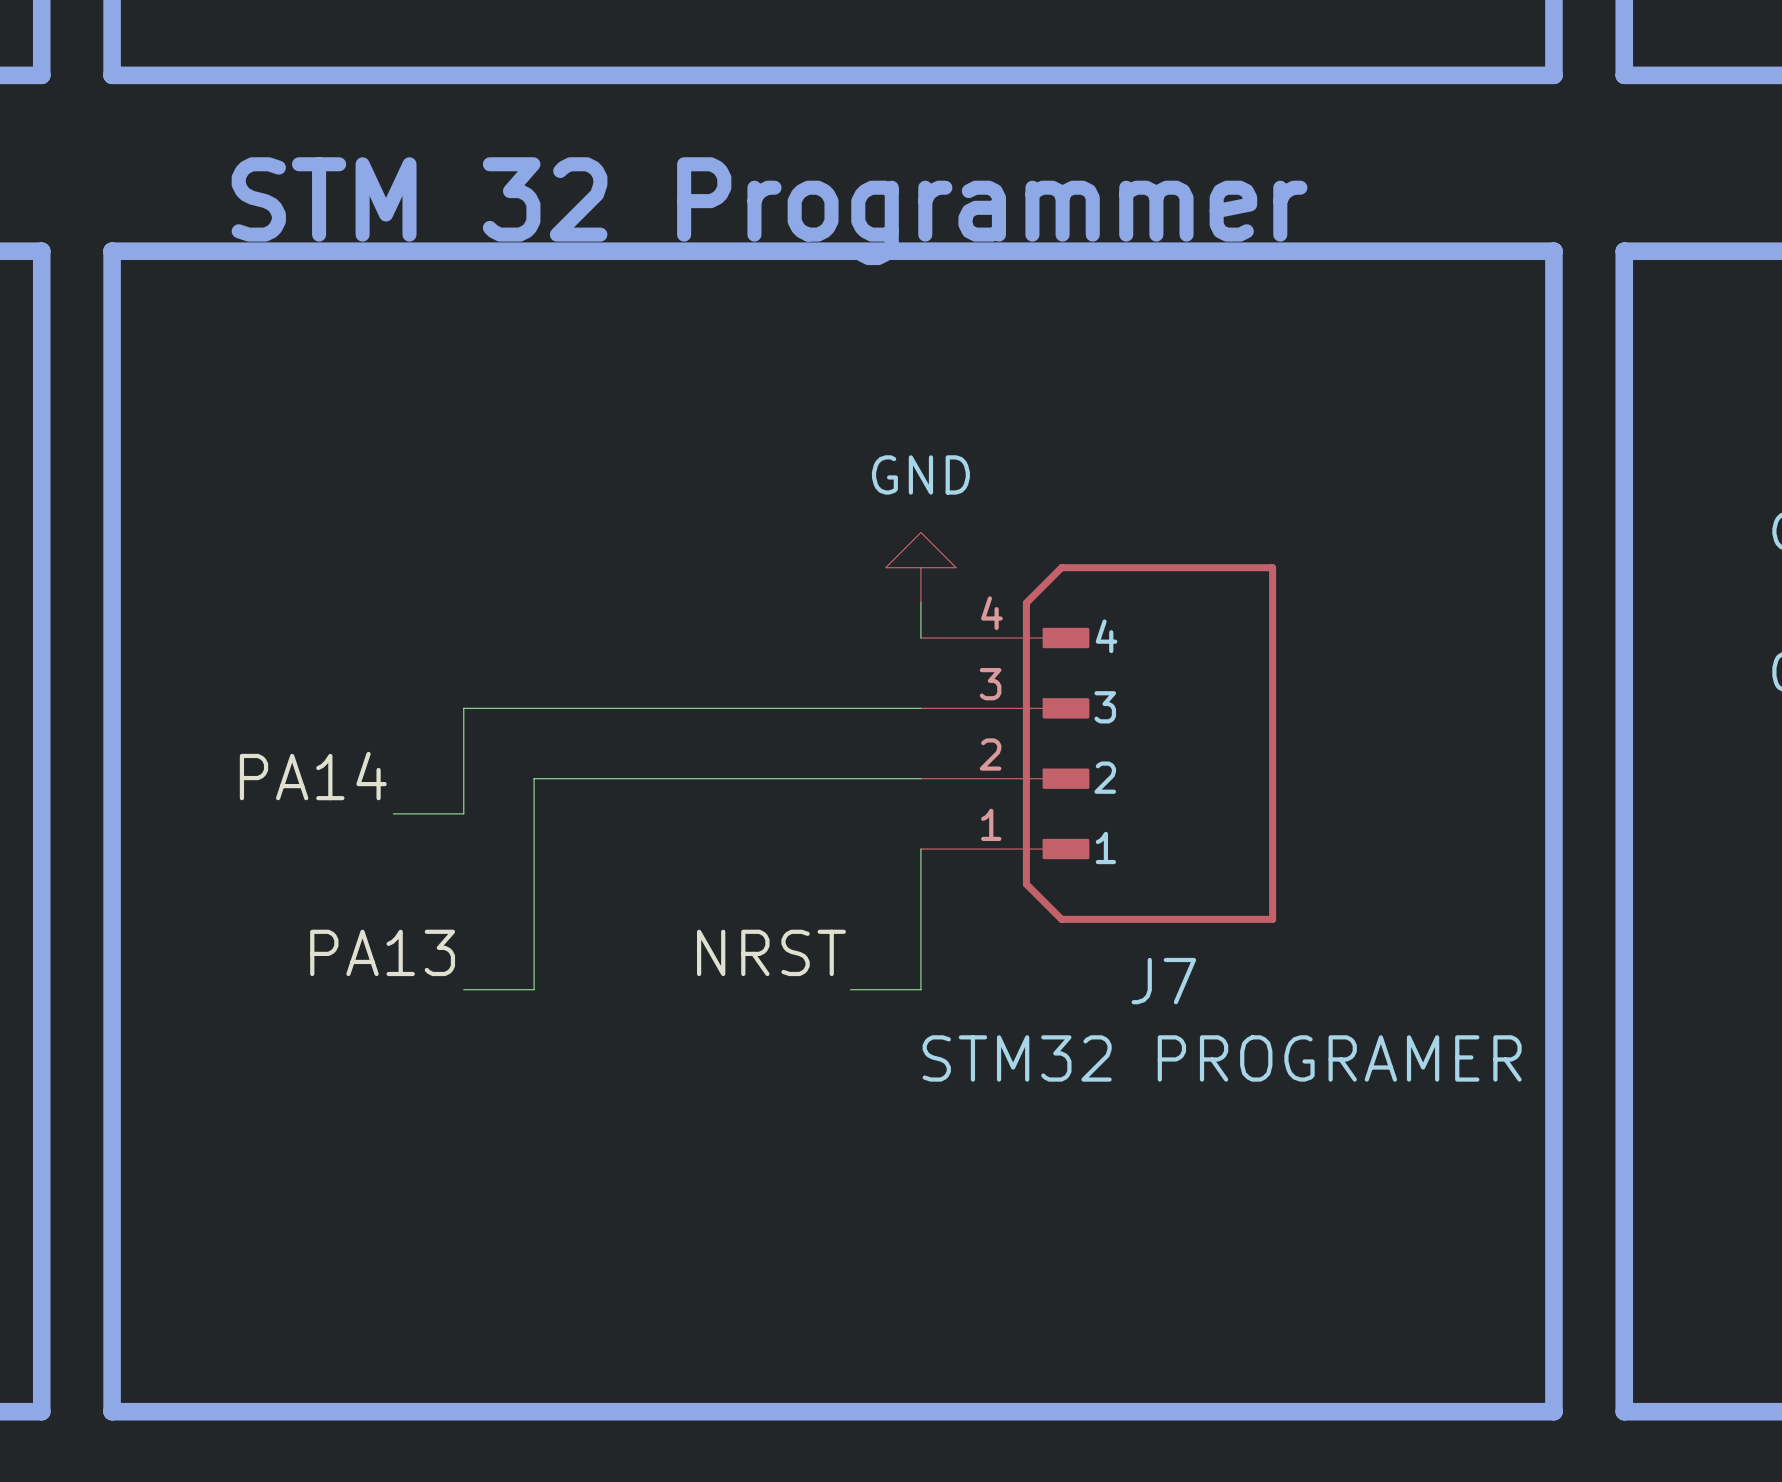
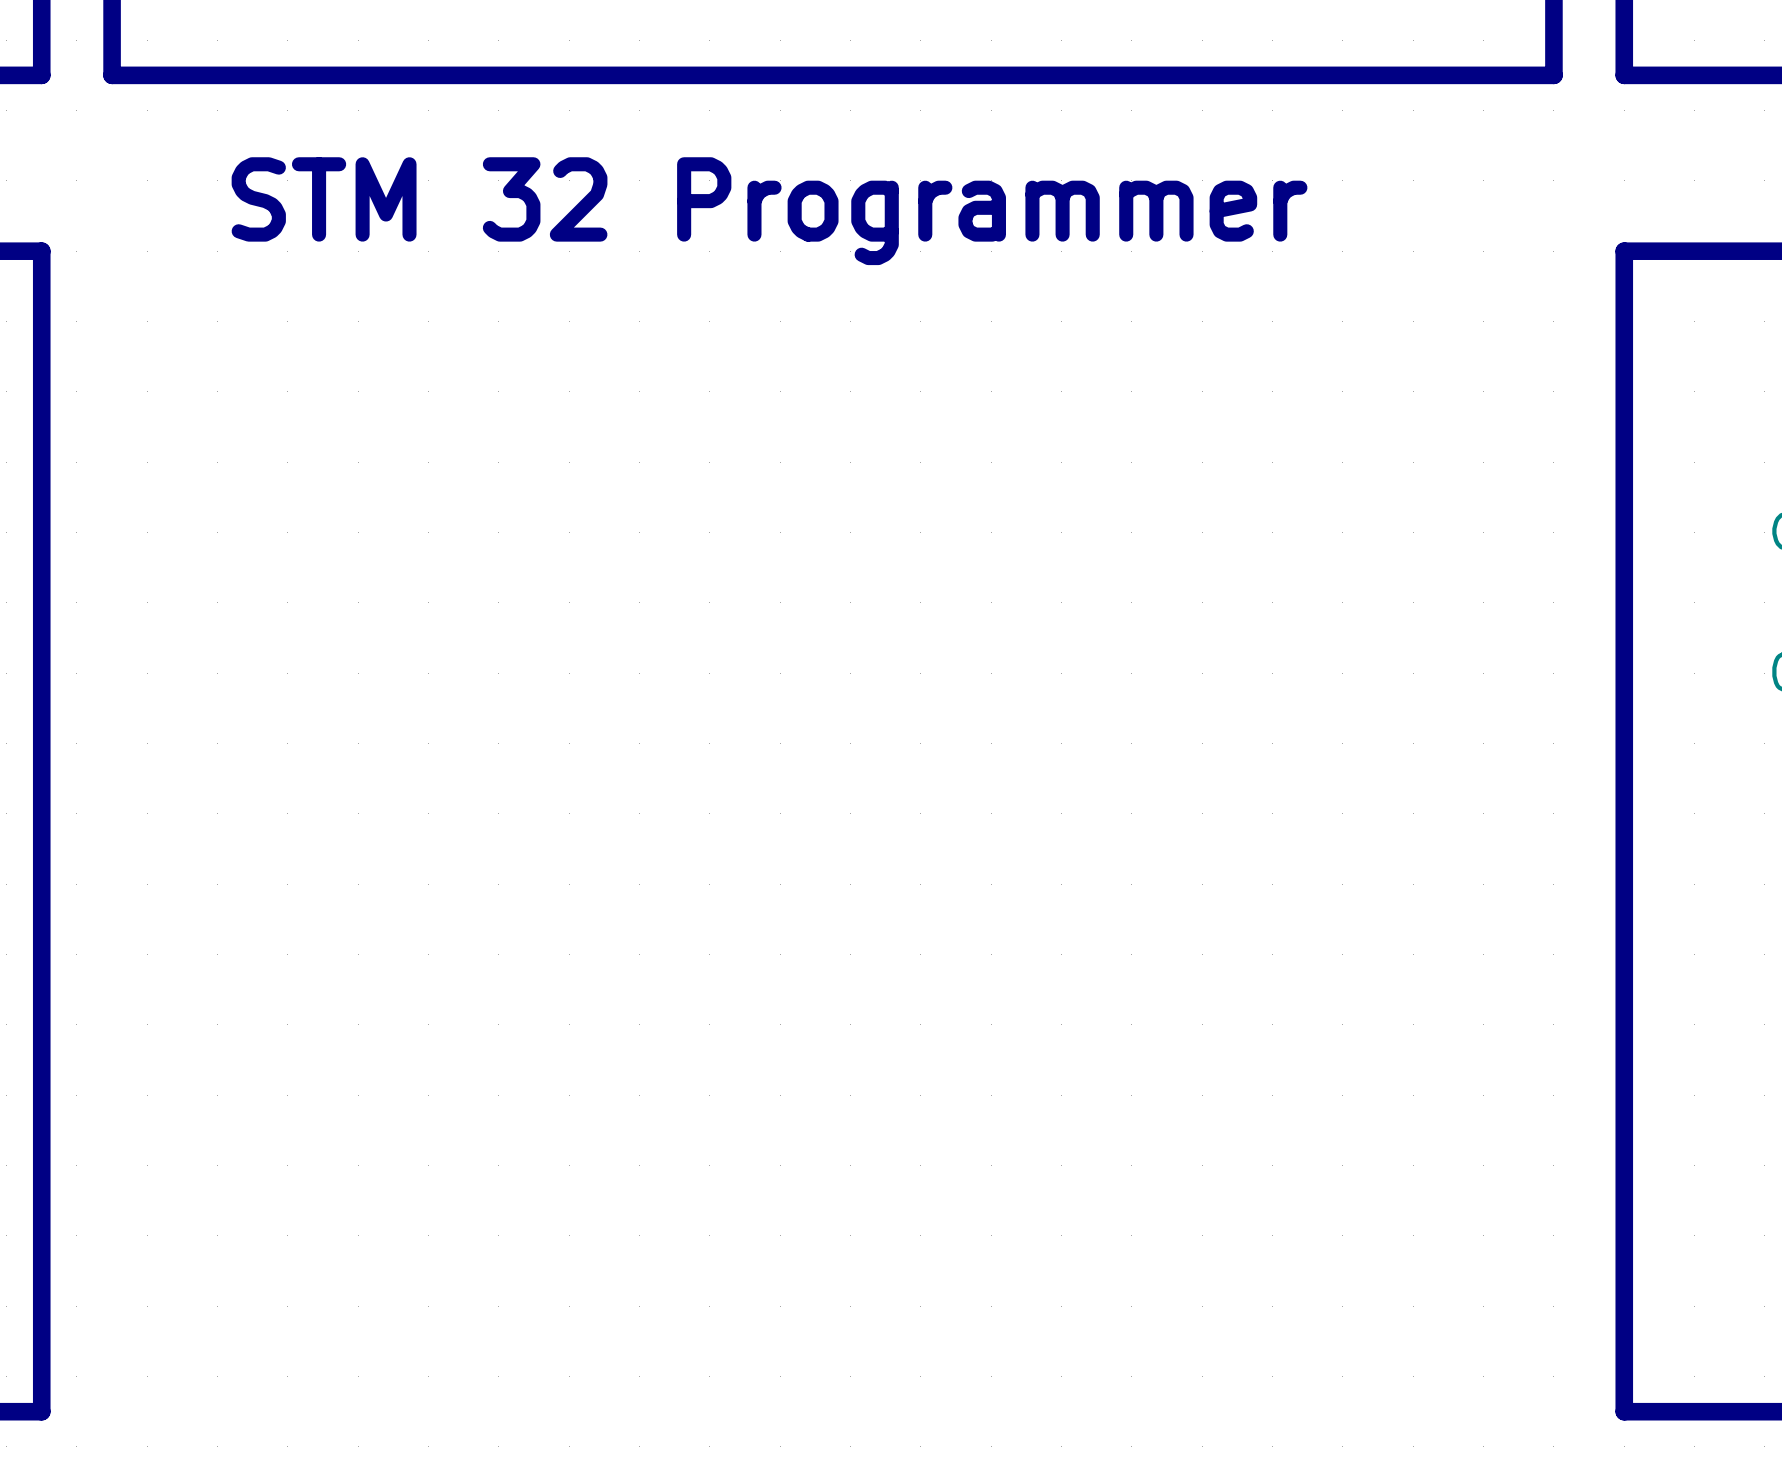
line: (112, 251) (112, 1411) (1553, 1411) (1553, 251) (112, 251) -> none
power symbol: GND (920, 567) -> none
wire: (920, 602) (920, 638) -> none
wire: (920, 708) (463, 708) (463, 813) (393, 813) -> none
J7: STM32 PROGRAMER (1098, 743) -> none
label: PA14 (313, 776) -> none
wire: (920, 778) (534, 778) (534, 989) (463, 989) -> none
wire: (920, 849) (920, 989) (850, 989) -> none
label: PA13 (382, 952) -> none
label: NRST (771, 952) -> none

